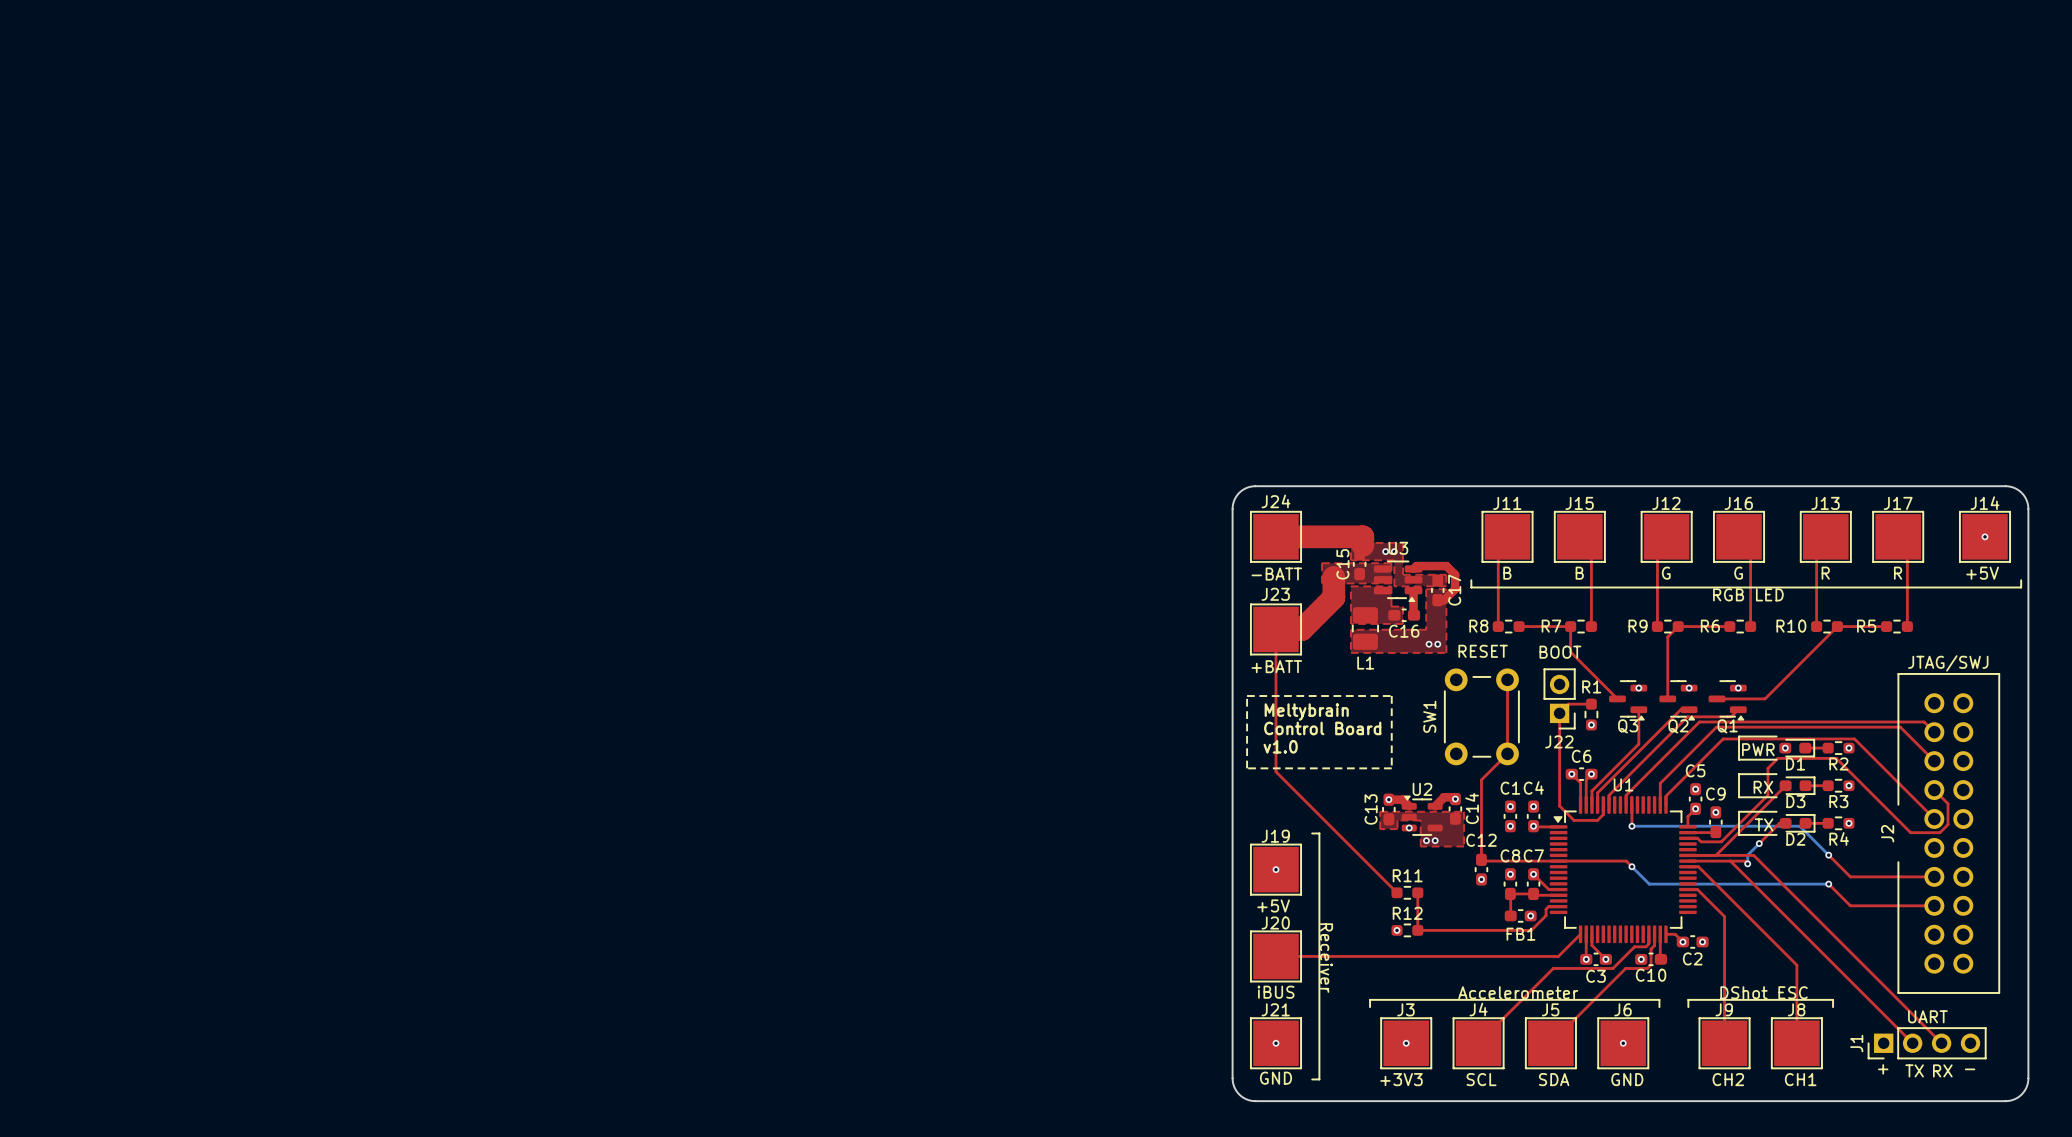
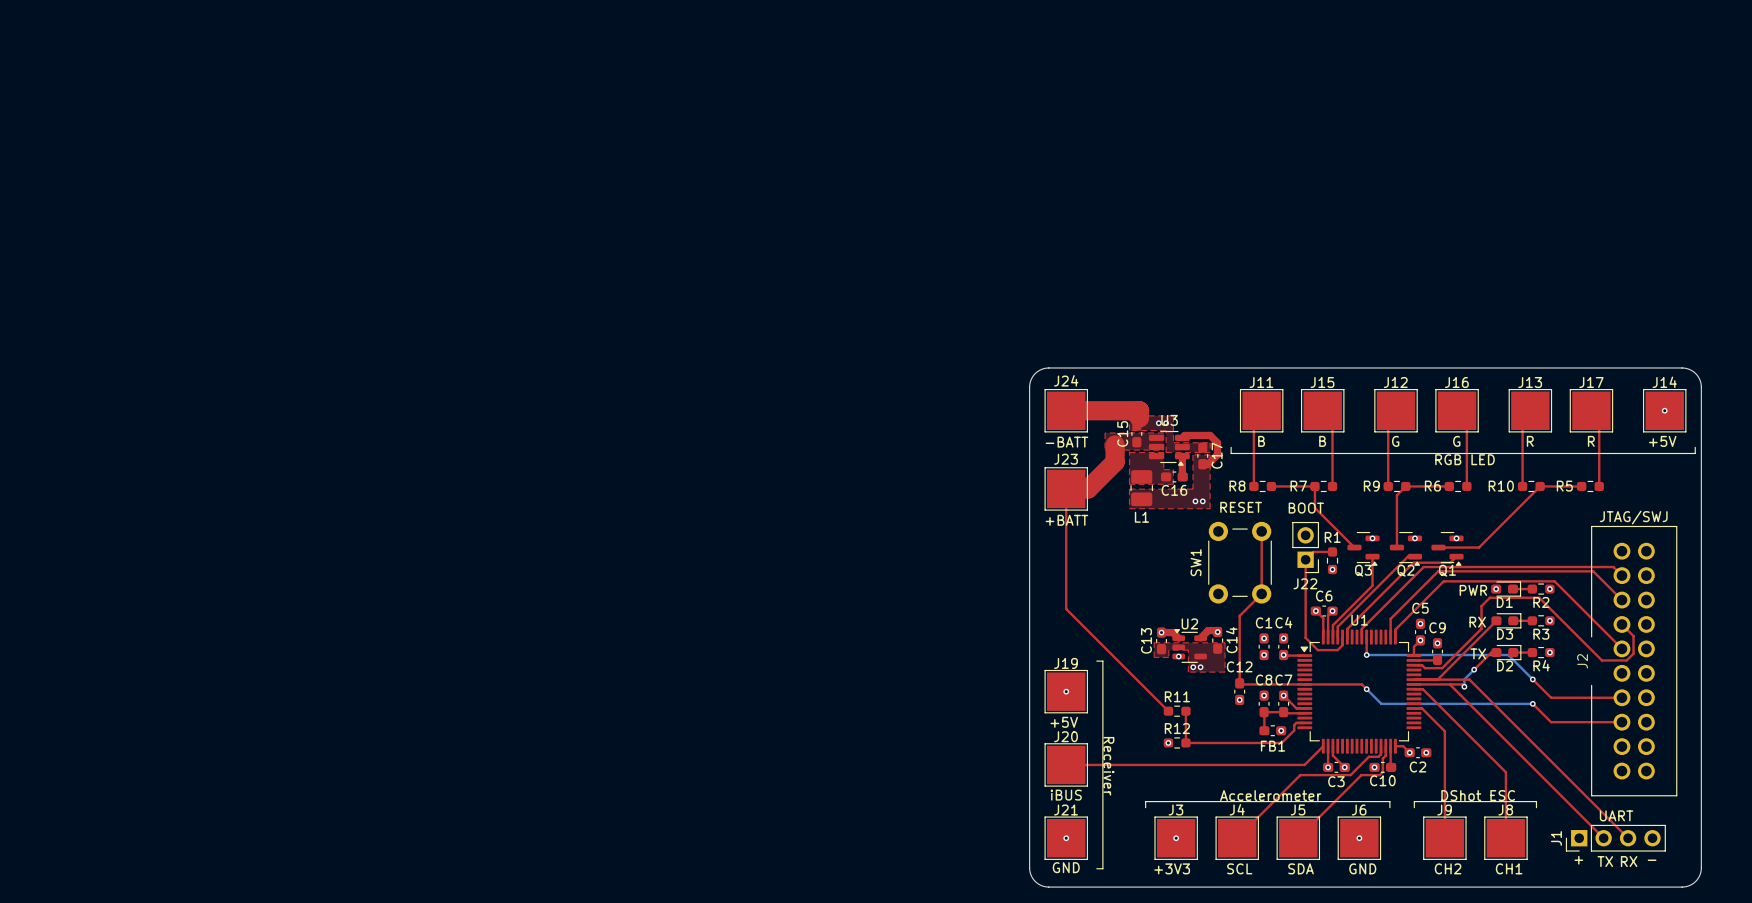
line: (1247, 696) (1391, 696) (1391, 768) (1247, 768) (1247, 696) -> none
text: Meltybrain (1306, 712) -> none
text: Control Board (1322, 728) -> none
line: (1776, 736) (1739, 736) (1739, 759) (1776, 759) -> none
text: v1.0 (1280, 746) -> none
line: (1776, 774) (1739, 774) (1739, 797) (1776, 797) -> none
line: (1776, 811) (1739, 811) (1739, 834) (1776, 834) -> none

